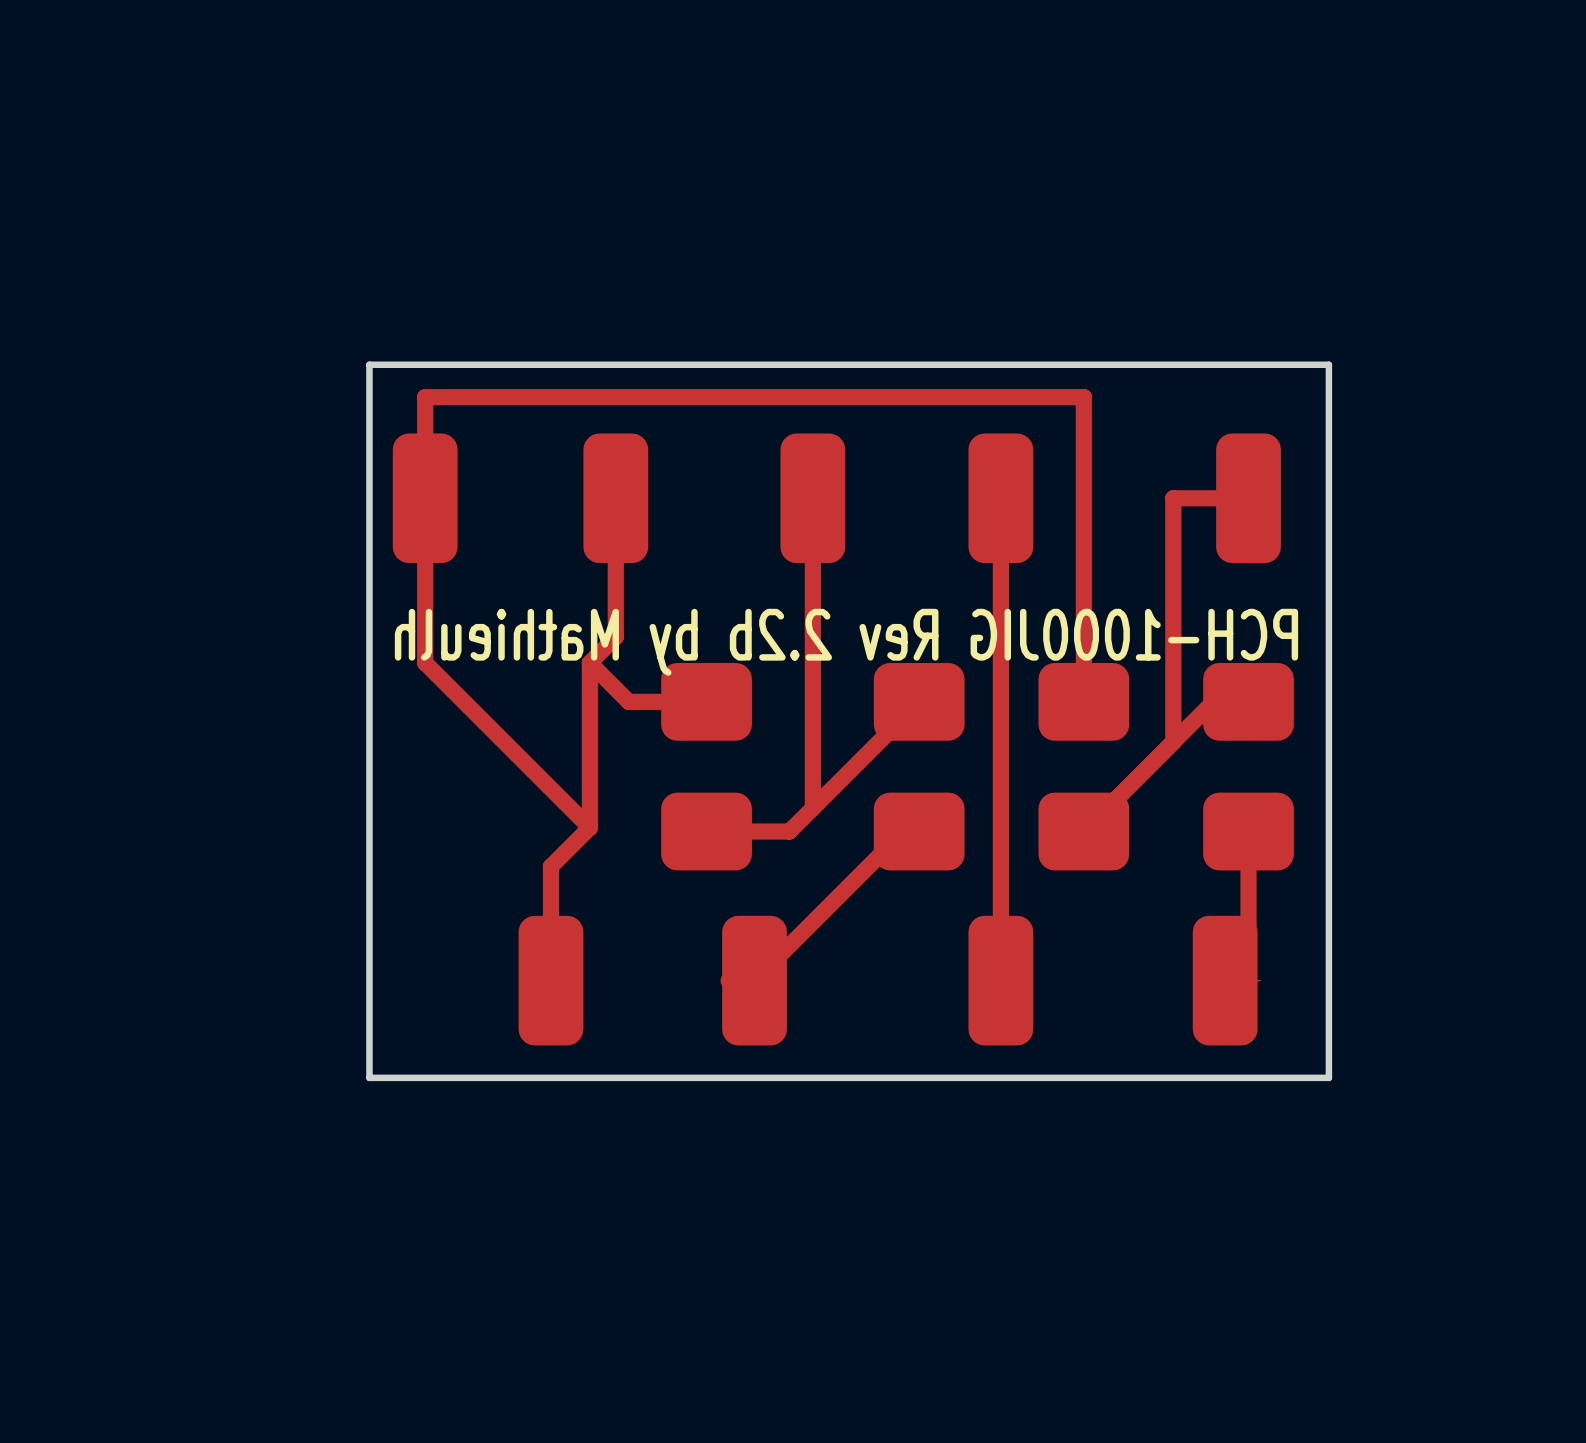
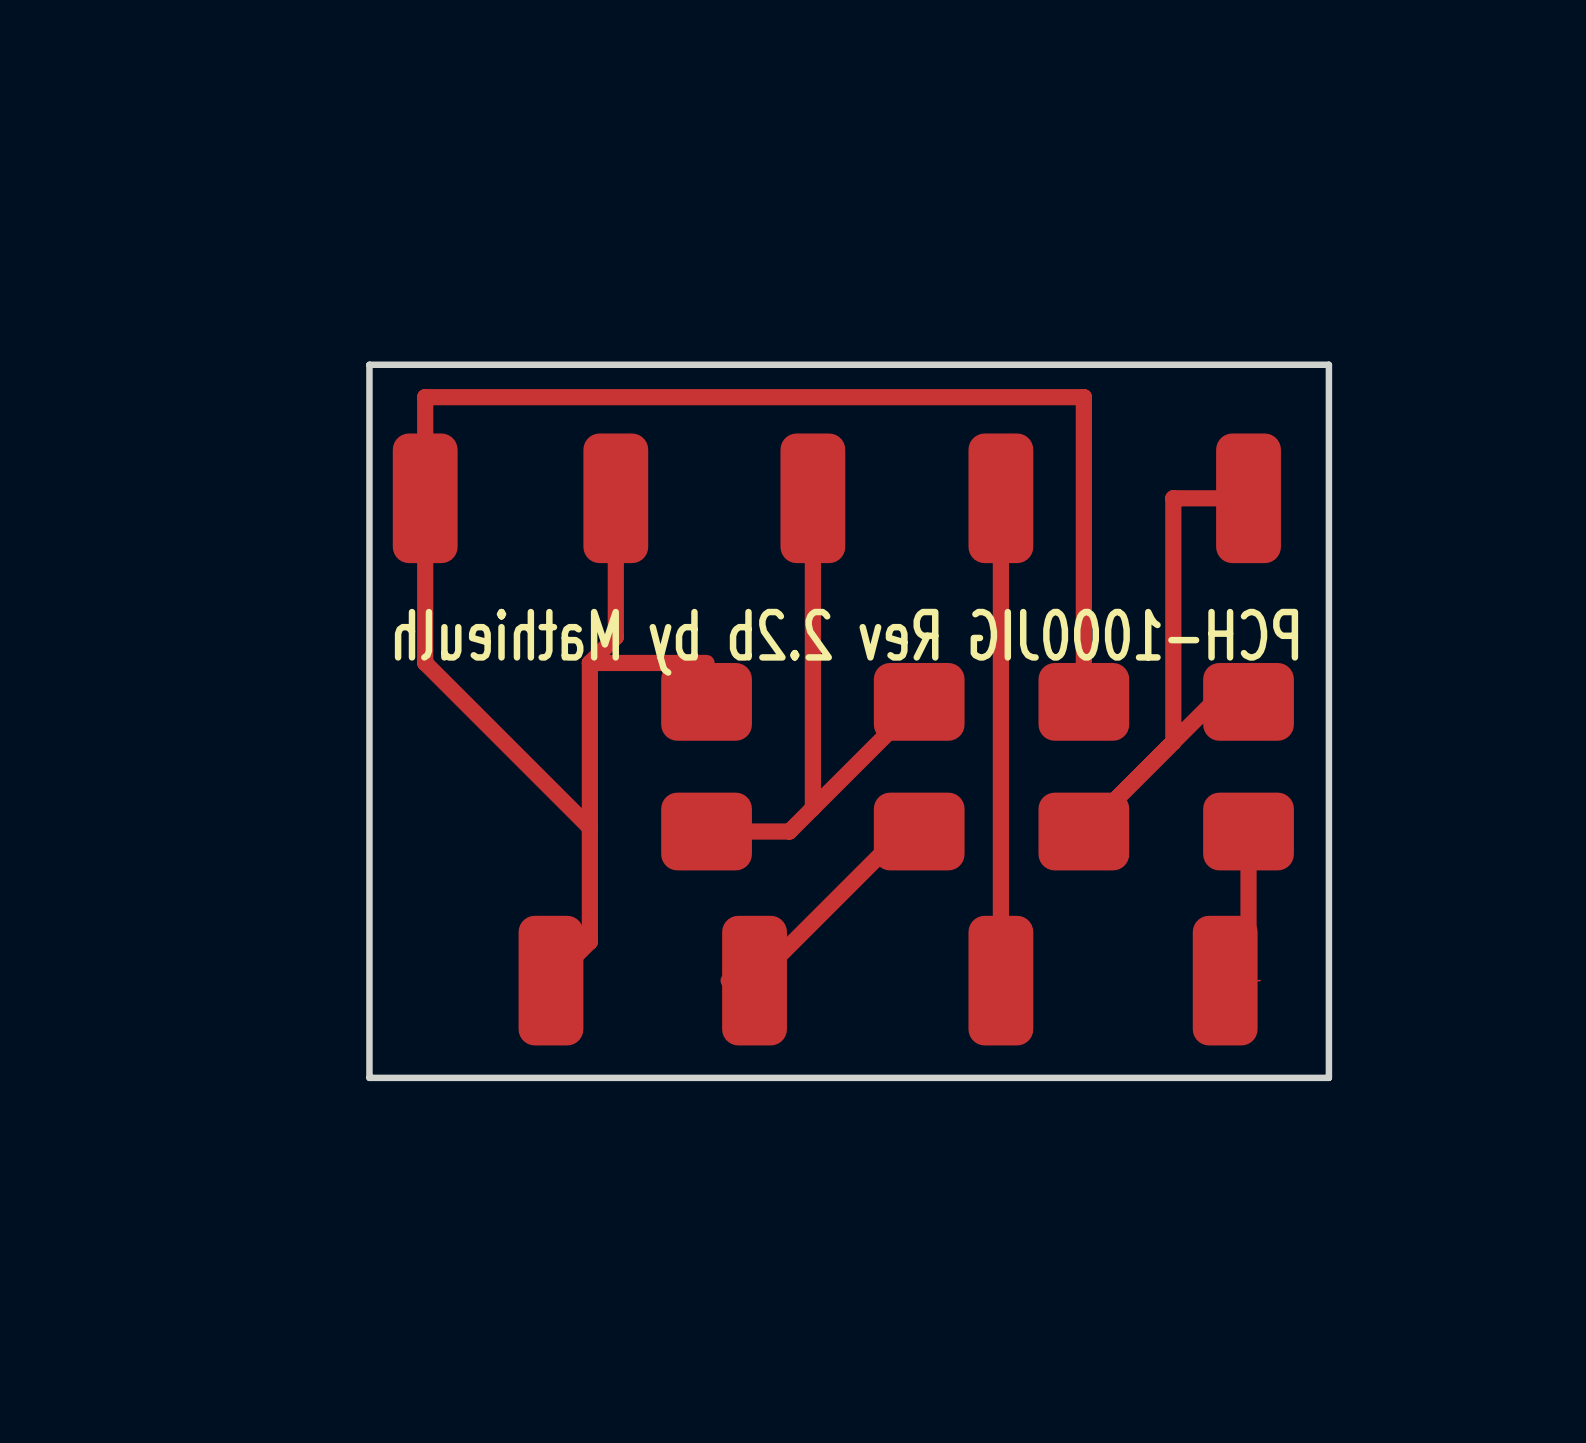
top track: (589, 662) (628, 701) (706, 701) -> (589, 662) (706, 662)
top track: (589, 827) (550, 866) (550, 980) -> (589, 827) (589, 941) (550, 980)

